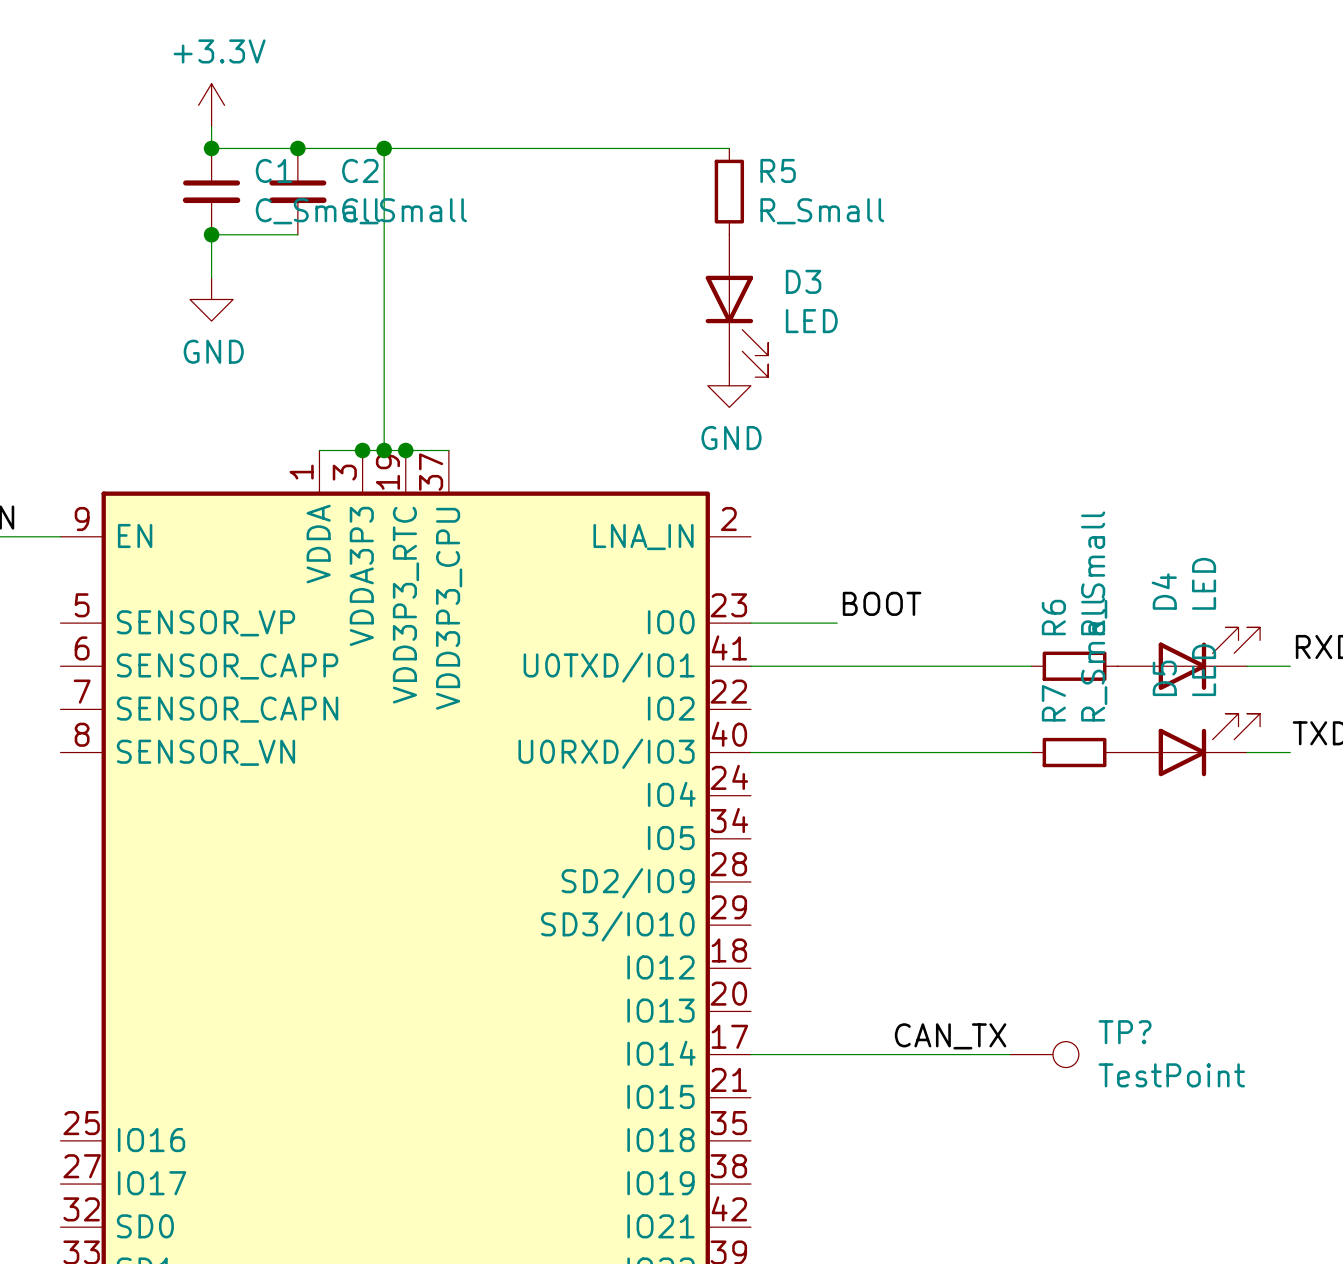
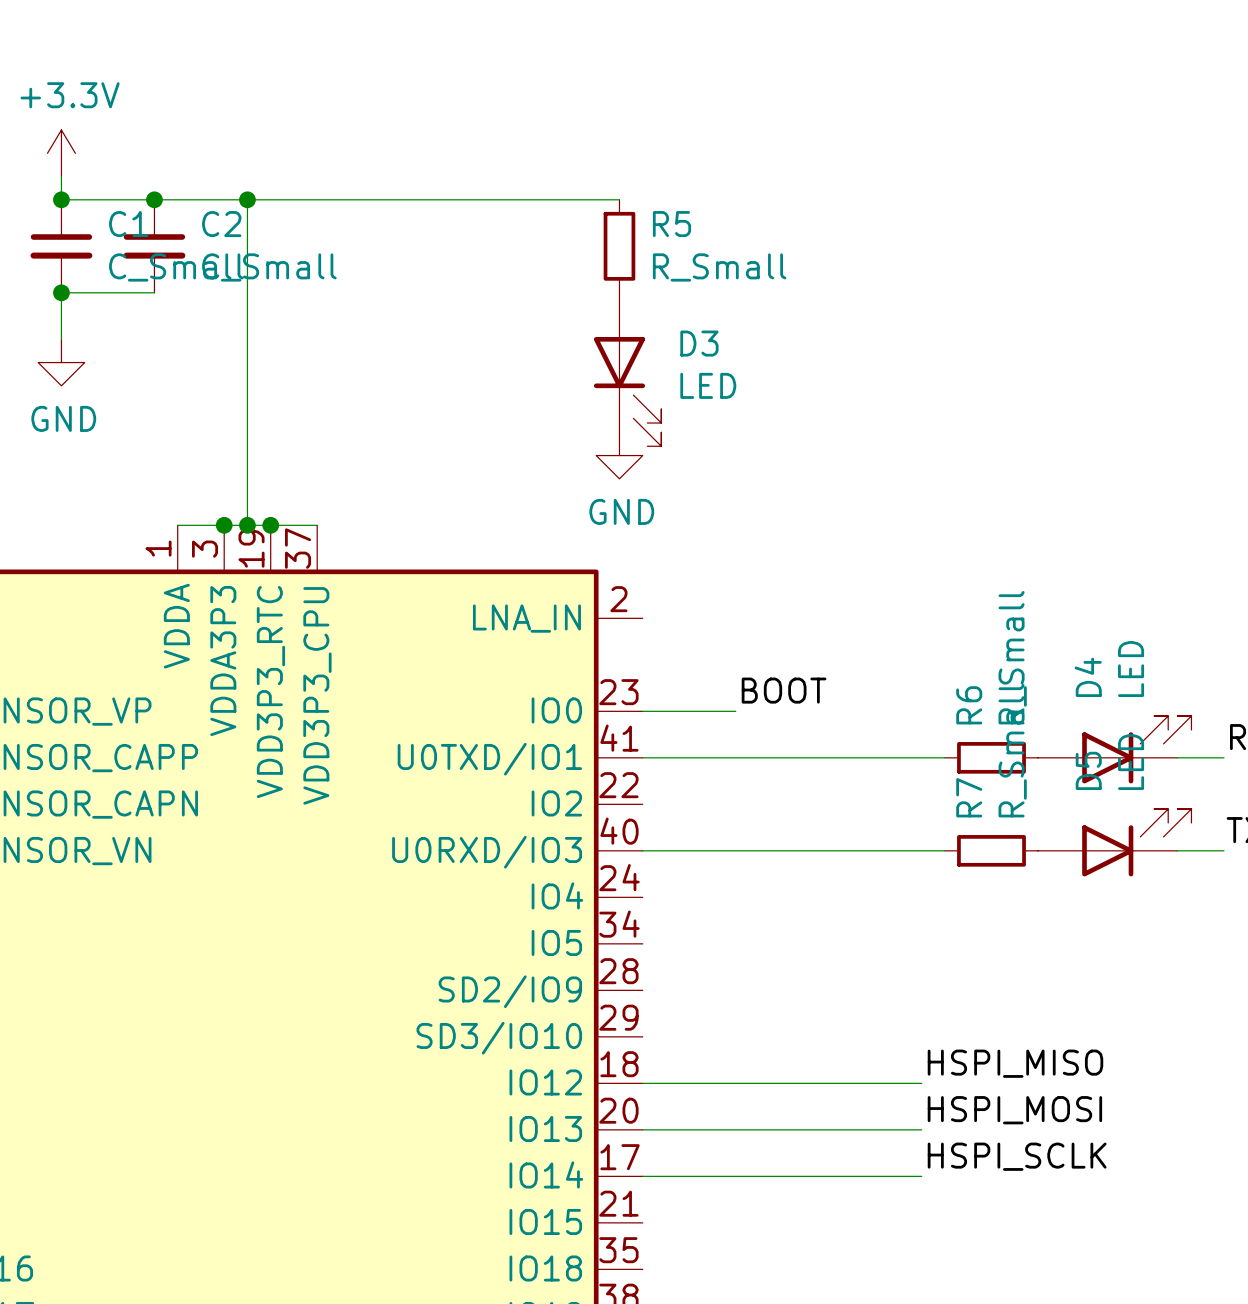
label: none -> HSPI_MISO (1015, 1063)
wire: none -> (642, 1083) (921, 1083)
label: none -> HSPI_MOSI (1014, 1110)
wire: none -> (642, 1129) (921, 1129)
label: CAN_TX (950, 1036) -> HSPI_SCLK (1017, 1156)
TP?: TestPoint (1044, 1054) -> none

